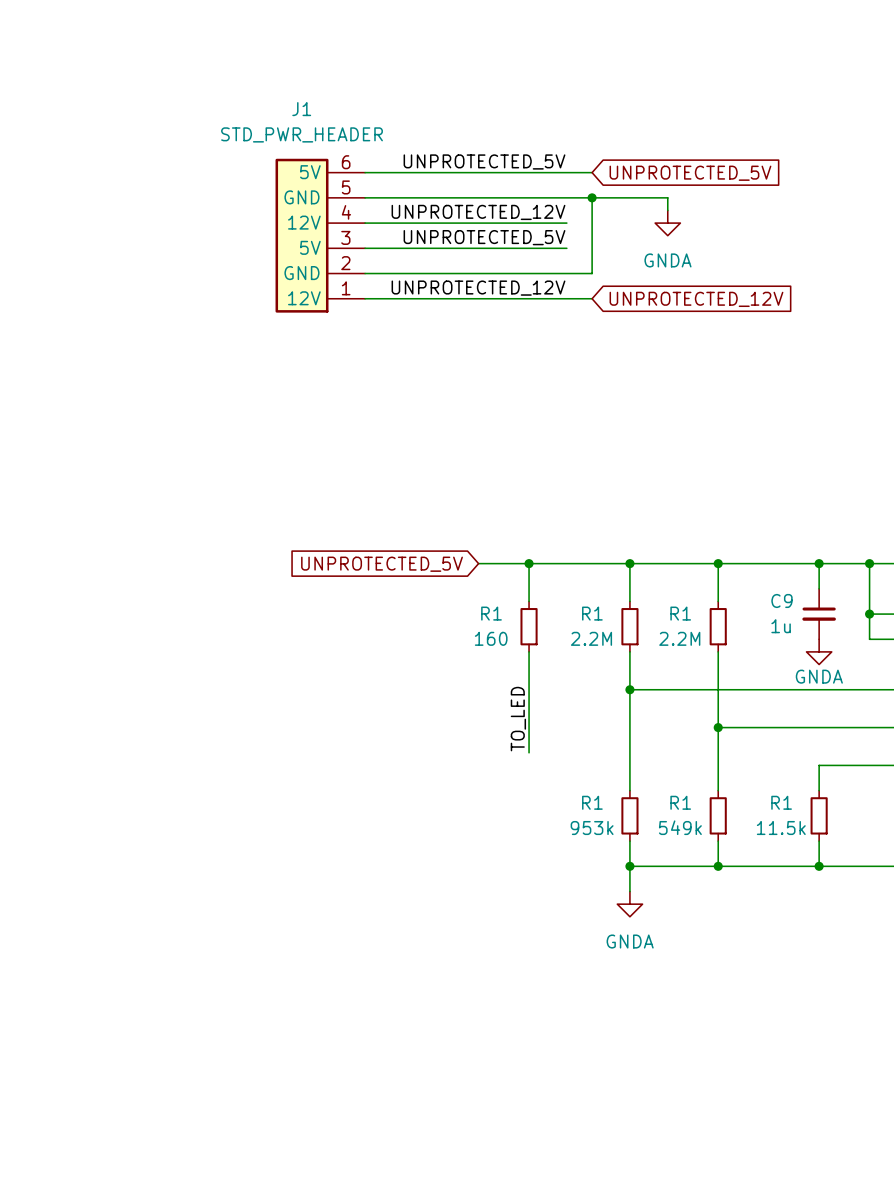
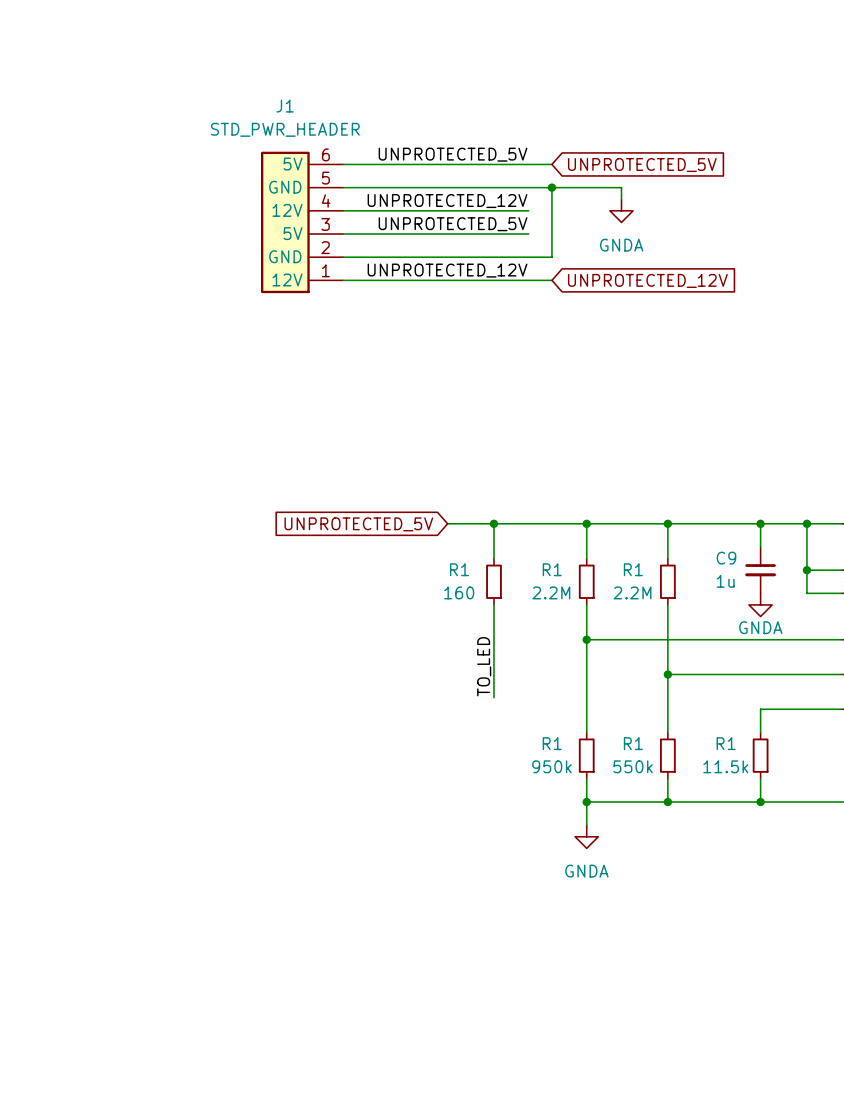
R1 value: 549k (680, 827) -> 550k (633, 766)
R1 value: 953k (592, 828) -> 950k (551, 766)

